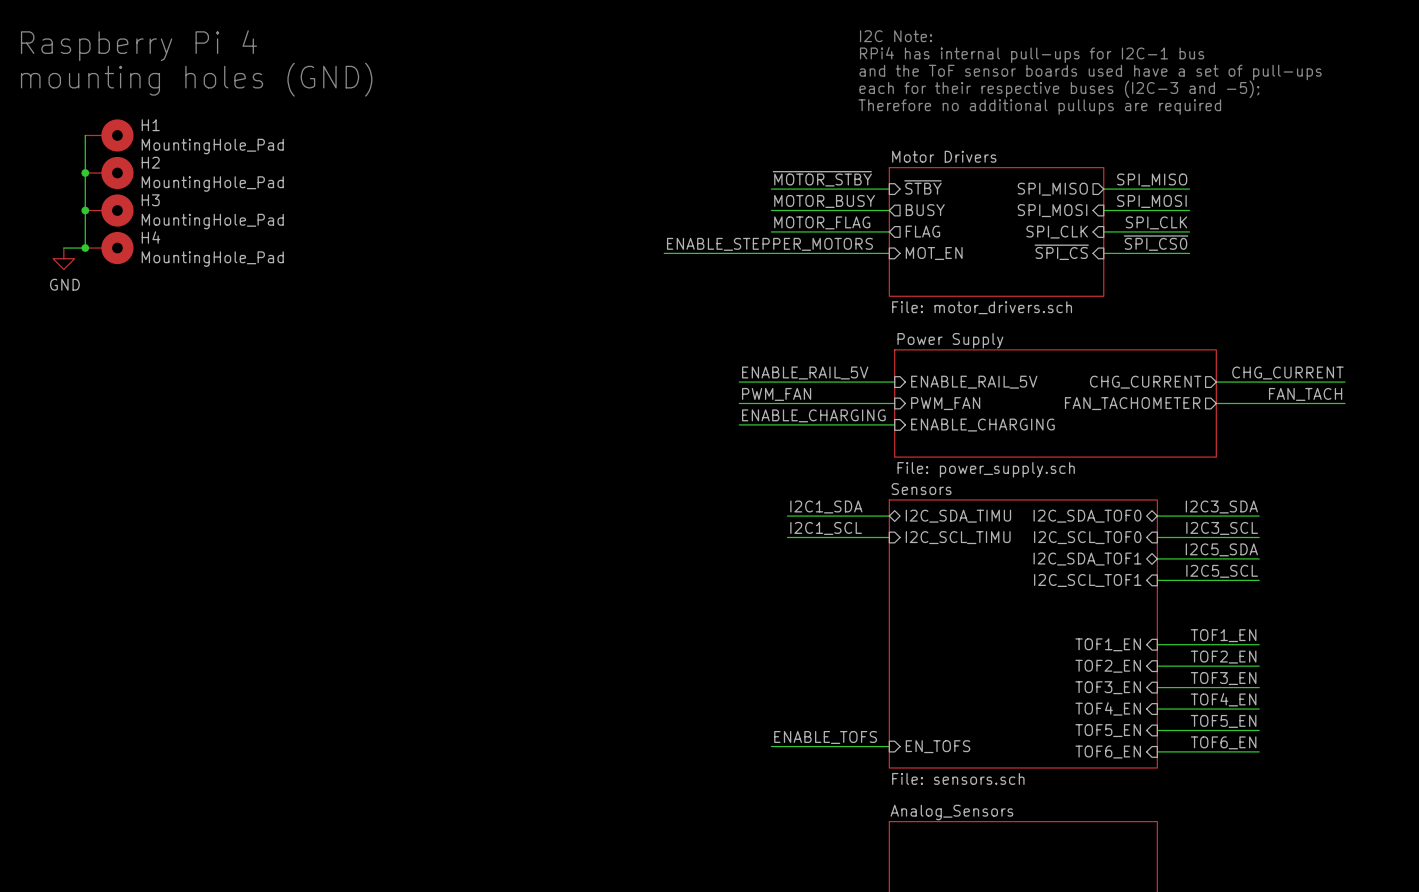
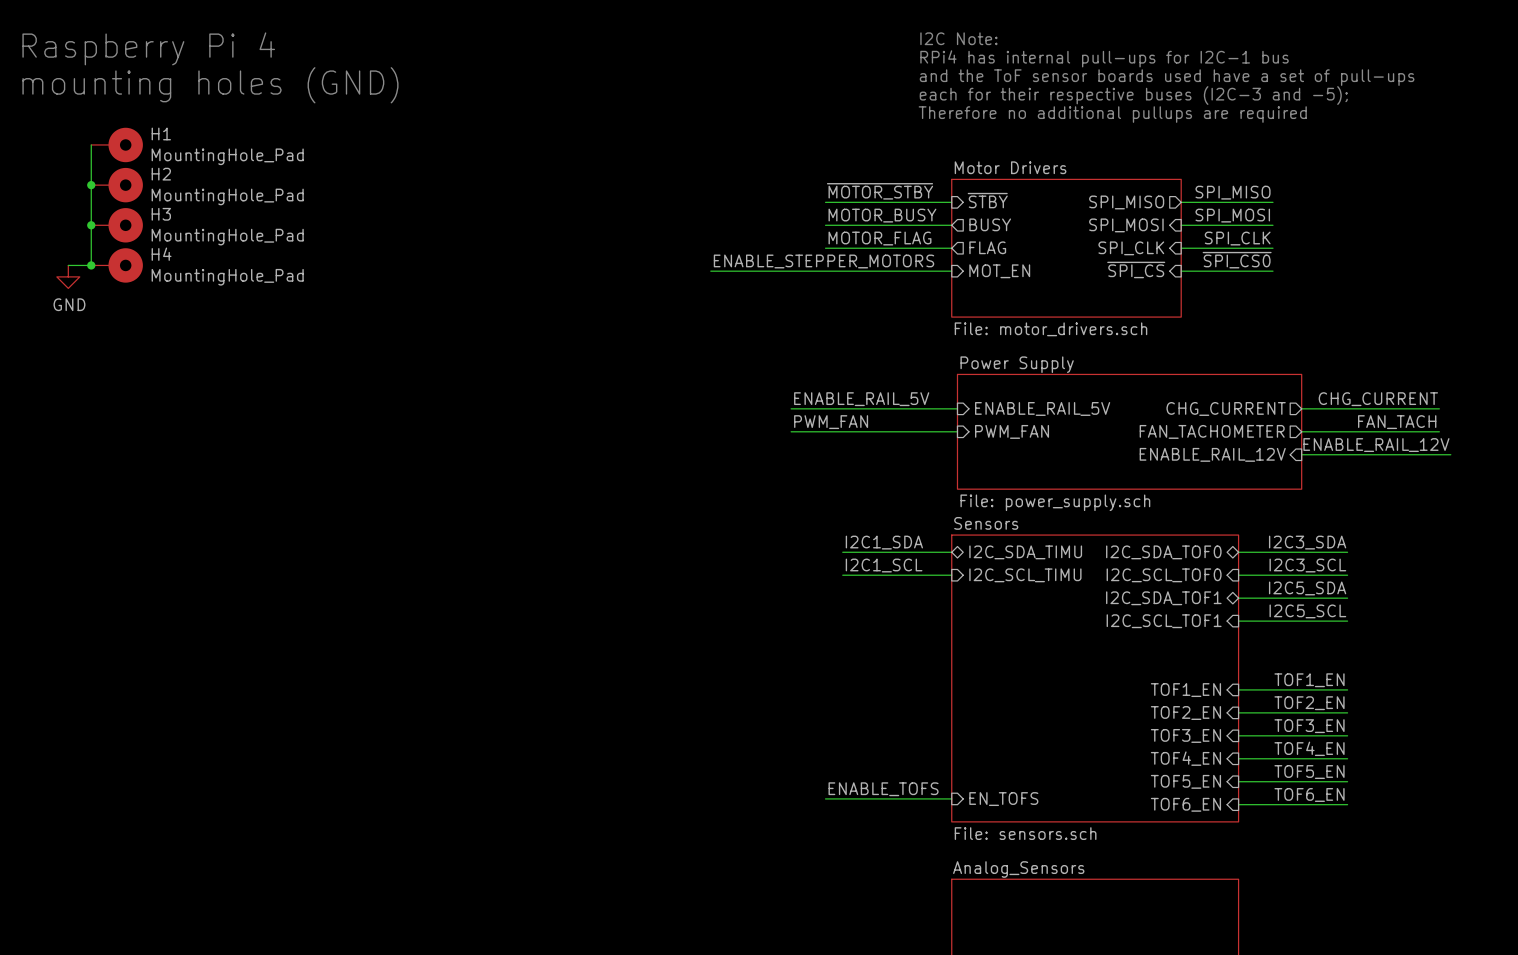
label: ENABLE_CHARGING (813, 415) -> none
label: none -> ENABLE_RAIL_12V (1376, 445)
wire: (739, 424) (894, 424) -> none
wire: none -> (1301, 454) (1450, 454)
sheet pin: ENABLE_CHARGING (982, 425) -> none
sheet pin: none -> ENABLE_RAIL_12V (1212, 454)

